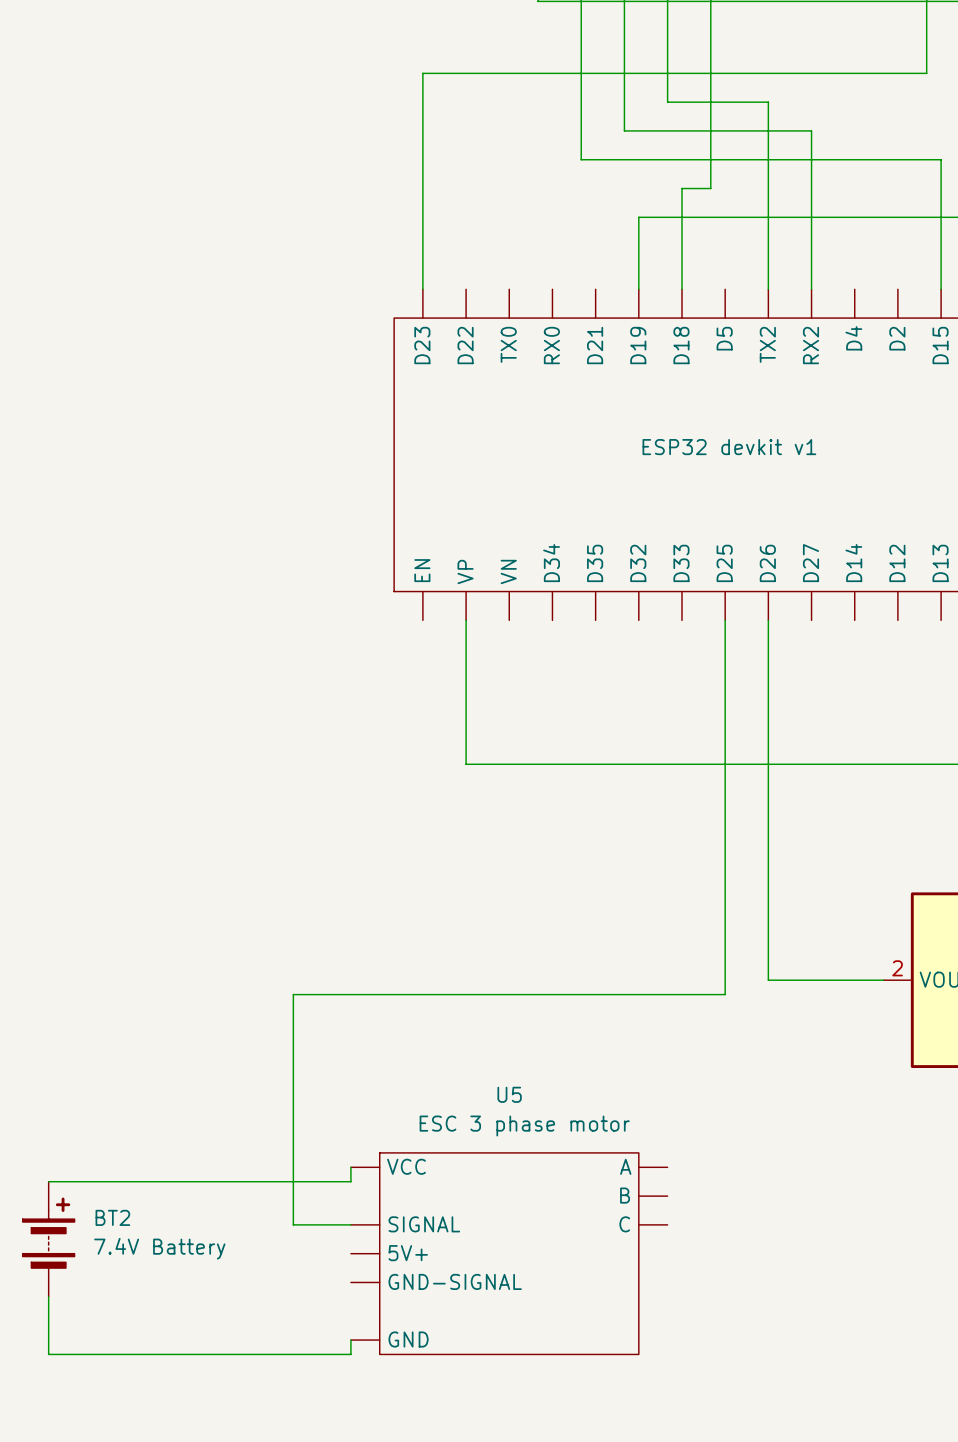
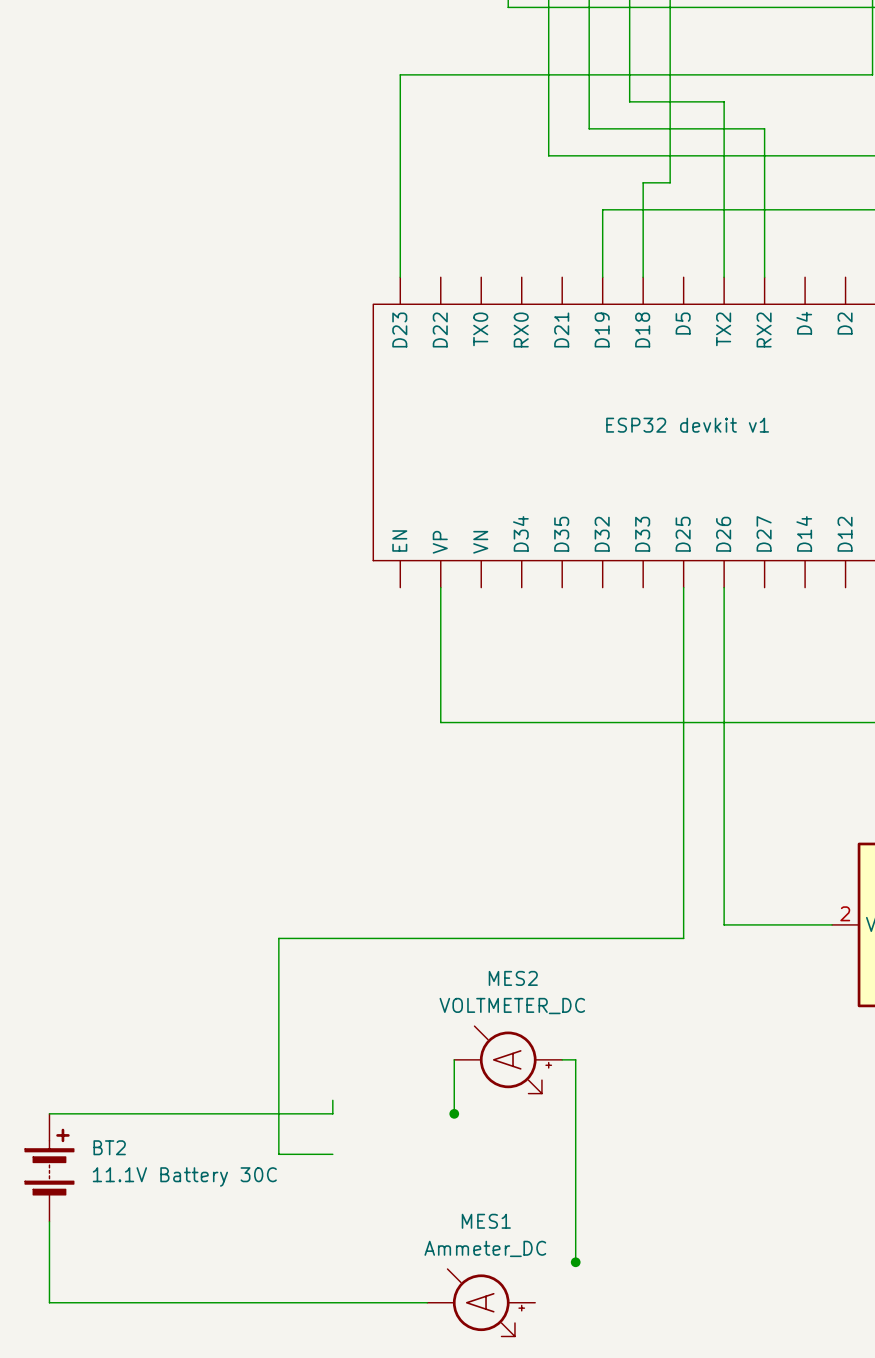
wire: none -> (454, 1059) (454, 1113)
MES2: none -> VOLTMETER_DC (508, 1059)
wire: none -> (562, 1059) (575, 1059) (575, 1262)
junction: none -> (454, 1113)
BT2 value: 7.4V Battery (159, 1248) -> 11.1V Battery 30C (184, 1176)
U5: ESC 3 phase motor (509, 1253) -> none
wire: (350, 1340) (350, 1354) (48, 1354) -> (427, 1302) (49, 1302) (49, 1275)
junction: none -> (575, 1262)
MES1: none -> Ammeter_DC (481, 1302)

